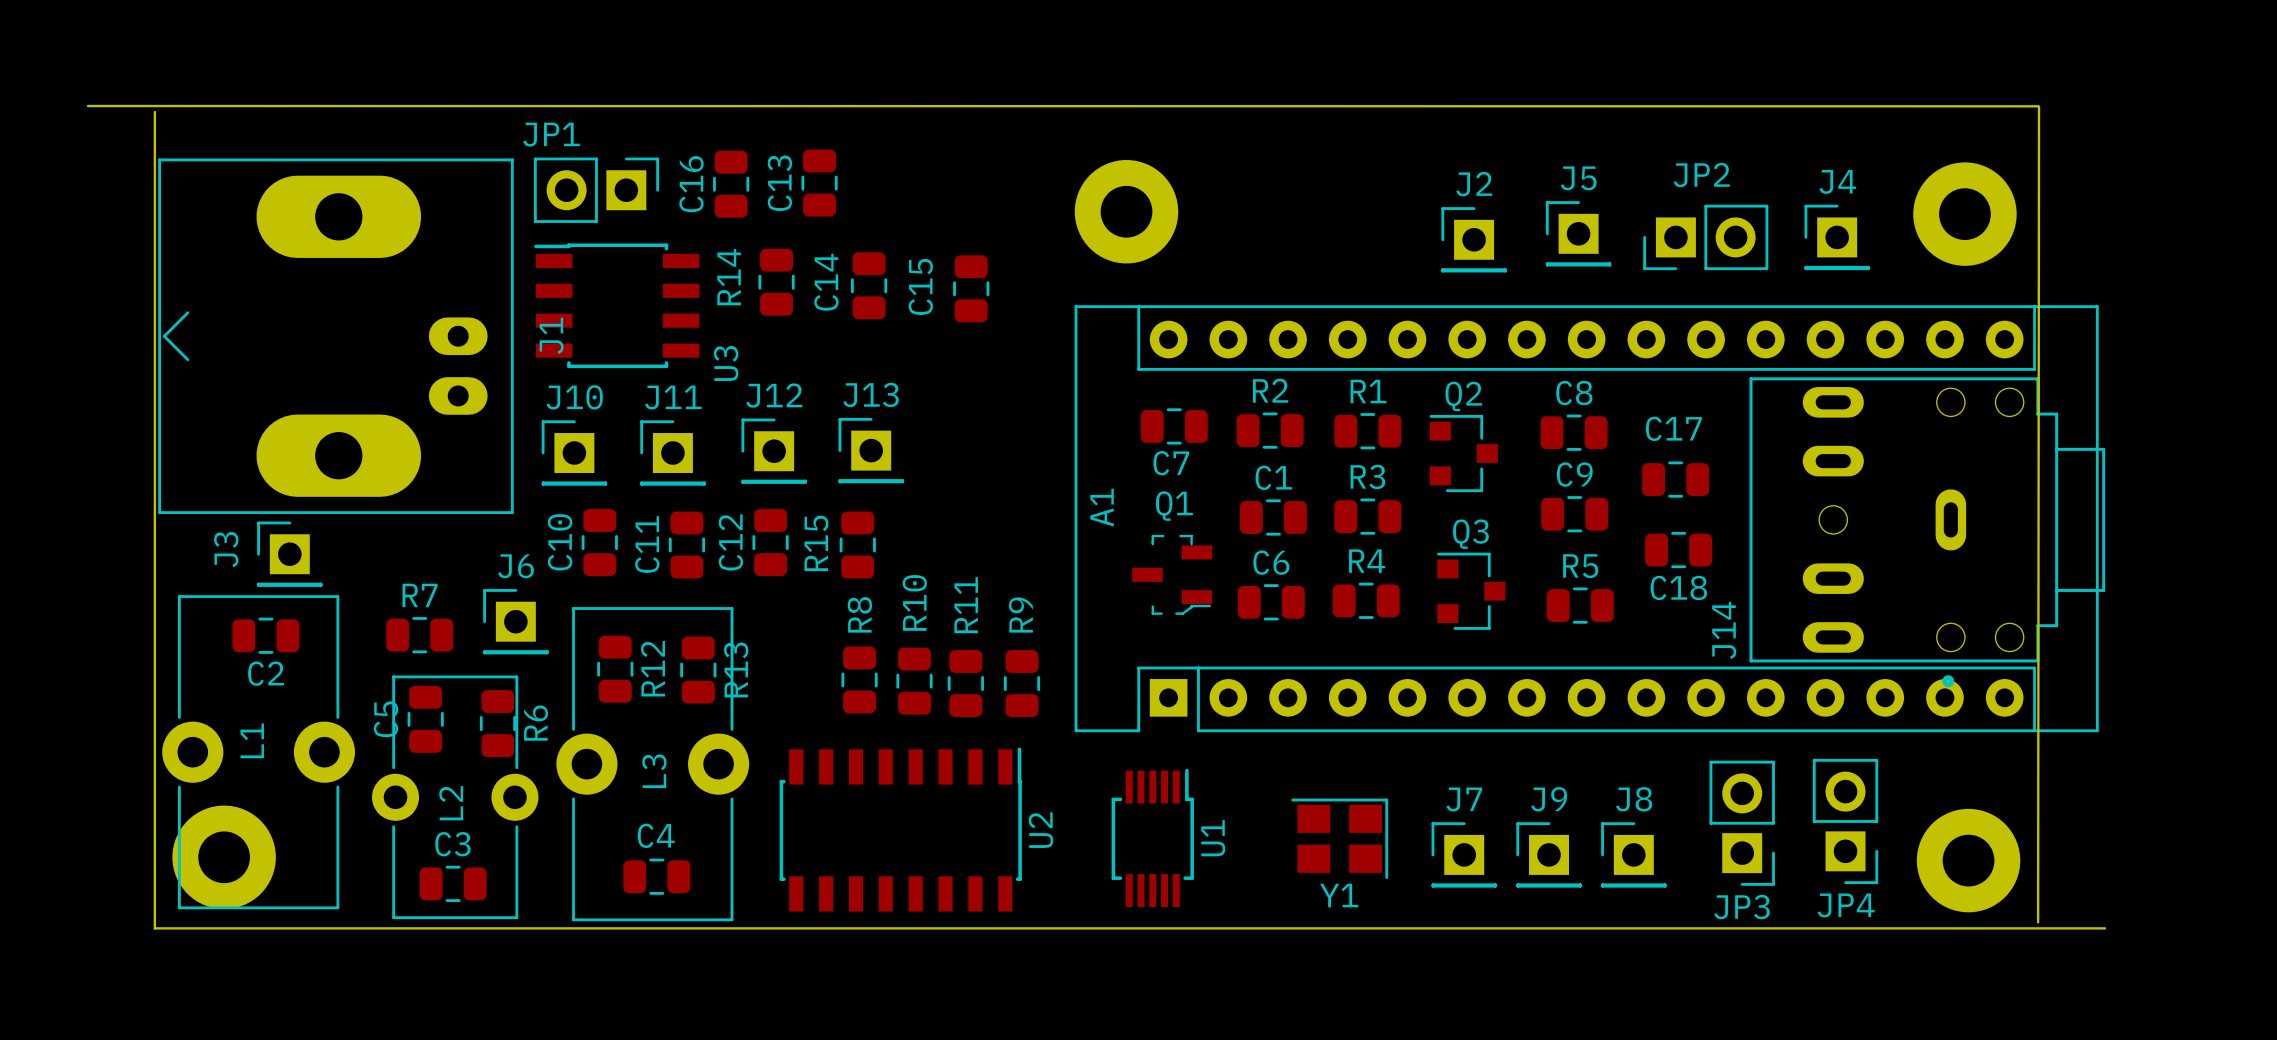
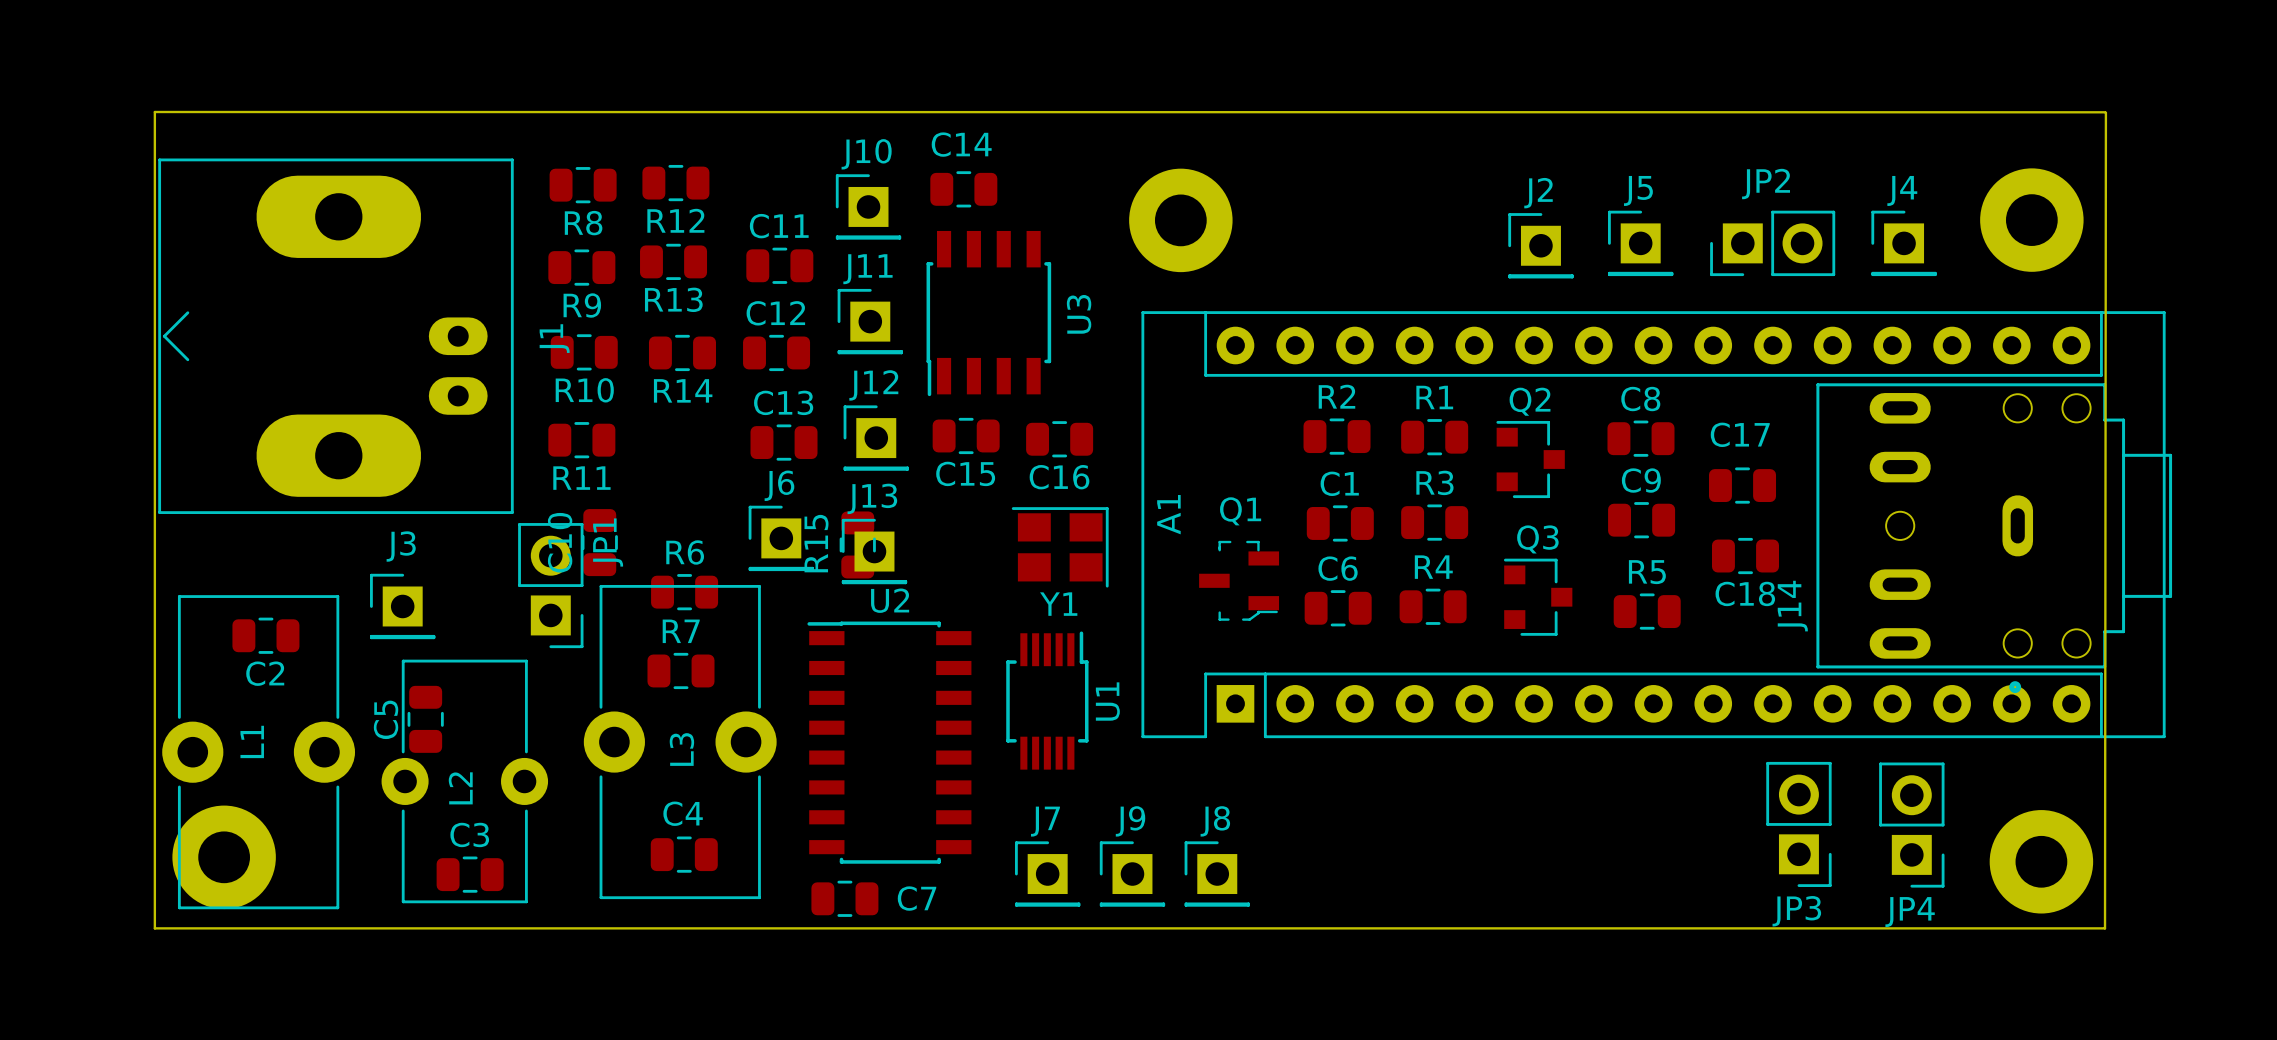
board edge: (87, 106) (2038, 106) -> (154, 112) (2105, 112)
board edge: (2039, 106) (2038, 922) -> (2105, 112) (2105, 928)
C13 rotation: 0° (819, 183) -> 90° clockwise (784, 442)
C13 position: (819, 183) -> (784, 442)
C16 name position: C16 (691, 184) -> C16 (1059, 477)
C16 rotation: 0° (731, 184) -> 90° clockwise (1059, 439)
C16 position: (731, 184) -> (1059, 439)
JP1 rotation: 0° (596, 190) -> 90° clockwise (550, 585)
JP1 position: (596, 190) -> (550, 585)
part position: (1126, 211) -> (1180, 220)
part position: (1964, 214) -> (2031, 220)
J5 position: (1578, 233) -> (1640, 243)
JP2 position: (1705, 237) -> (1772, 243)
J4 position: (1837, 237) -> (1904, 243)
J2 position: (1474, 239) -> (1540, 245)
R14 name position: R14 (729, 277) -> R14 (683, 390)
R14 rotation: 0° (776, 282) -> 90° clockwise (682, 352)
R14 position: (776, 282) -> (682, 352)
C14 rotation: 0° (869, 285) -> 90° clockwise (963, 189)
C14 position: (869, 285) -> (963, 189)
C15 name position: C15 (920, 286) -> C15 (965, 473)
C15 rotation: 0° (971, 288) -> 90° clockwise (966, 435)
C15 position: (971, 288) -> (966, 435)
U3 rotation: 0° (616, 305) -> 90° counterclockwise (988, 313)
U3 position: (616, 305) -> (988, 313)
U3 name position: U3 (726, 363) -> U3 (1079, 314)
C7 position: (1174, 426) -> (844, 898)
R2 position: (1270, 430) -> (1337, 436)
R1 position: (1367, 431) -> (1434, 437)
C8 position: (1574, 432) -> (1640, 438)
J13 position: (871, 450) -> (874, 551)
J12 position: (774, 451) -> (876, 438)
J10 position: (574, 453) -> (868, 206)
J11 position: (672, 453) -> (870, 321)
Q2 position: (1463, 453) -> (1530, 459)
C7 name position: C7 (1171, 463) -> C7 (917, 898)
C17 position: (1675, 479) -> (1742, 485)
C9 position: (1574, 514) -> (1641, 520)
R3 position: (1367, 516) -> (1434, 522)
C1 position: (1273, 517) -> (1340, 523)
A1 position: (1586, 518) -> (1653, 524)
J14 position: (1927, 532) -> (1994, 538)
C12 rotation: 0° (770, 542) -> 90° clockwise (776, 352)
C12 position: (770, 542) -> (776, 352)
C11 rotation: 0° (686, 544) -> 90° clockwise (779, 265)
C11 position: (686, 544) -> (779, 265)
J3 name rotation: 0° (226, 549) -> 90° clockwise (401, 546)
J3 name position: J3 (226, 549) -> J3 (401, 546)
C18 position: (1678, 550) -> (1745, 556)
J3 position: (289, 554) -> (402, 606)
Q1 position: (1172, 574) -> (1239, 580)
Q3 position: (1471, 591) -> (1538, 597)
R4 position: (1366, 600) -> (1433, 606)
R10 name position: R10 (914, 602) -> R10 (584, 390)
C6 position: (1271, 602) -> (1338, 608)
R11 name position: R11 (966, 605) -> R11 (581, 478)
R5 position: (1580, 605) -> (1647, 611)
R8 name position: R8 (859, 614) -> R8 (583, 223)
R9 name position: R9 (1020, 615) -> R9 (582, 305)
J6 position: (515, 621) -> (781, 538)
J14 name position: J14 (1724, 630) -> J14 (1792, 606)
R7 position: (419, 635) -> (680, 670)
R12 rotation: 0° (615, 669) -> 90° clockwise (675, 183)
R12 position: (615, 669) -> (675, 183)
R13 rotation: 0° (698, 670) -> 90° clockwise (673, 261)
R13 position: (698, 670) -> (673, 261)
R8 rotation: 0° (859, 679) -> 90° clockwise (583, 185)
R8 position: (859, 679) -> (583, 185)
R10 rotation: 0° (914, 681) -> 90° clockwise (584, 352)
R10 position: (914, 681) -> (584, 352)
R11 rotation: 0° (965, 683) -> 90° clockwise (581, 440)
R11 position: (965, 683) -> (581, 440)
R9 rotation: 0° (1021, 683) -> 90° clockwise (581, 267)
R9 position: (1021, 683) -> (581, 267)
R6 rotation: 0° (497, 723) -> 90° clockwise (684, 592)
R6 position: (497, 723) -> (684, 592)
R6 name position: R6 (536, 723) -> R6 (685, 552)
L3 position: (652, 764) -> (680, 742)
L2 position: (455, 797) -> (464, 781)
JP4 position: (1845, 821) -> (1911, 825)
JP3 position: (1742, 823) -> (1798, 824)
U2 rotation: 0° (900, 829) -> 90° counterclockwise (889, 742)
U1 position: (1152, 837) -> (1047, 700)
Y1 position: (1339, 838) -> (1060, 547)
J7 position: (1464, 854) -> (1047, 874)
J9 position: (1549, 854) -> (1132, 874)
J8 position: (1633, 854) -> (1217, 874)
part position: (1968, 860) -> (2041, 861)
C4 position: (656, 876) -> (684, 854)
C3 position: (453, 883) -> (470, 874)

